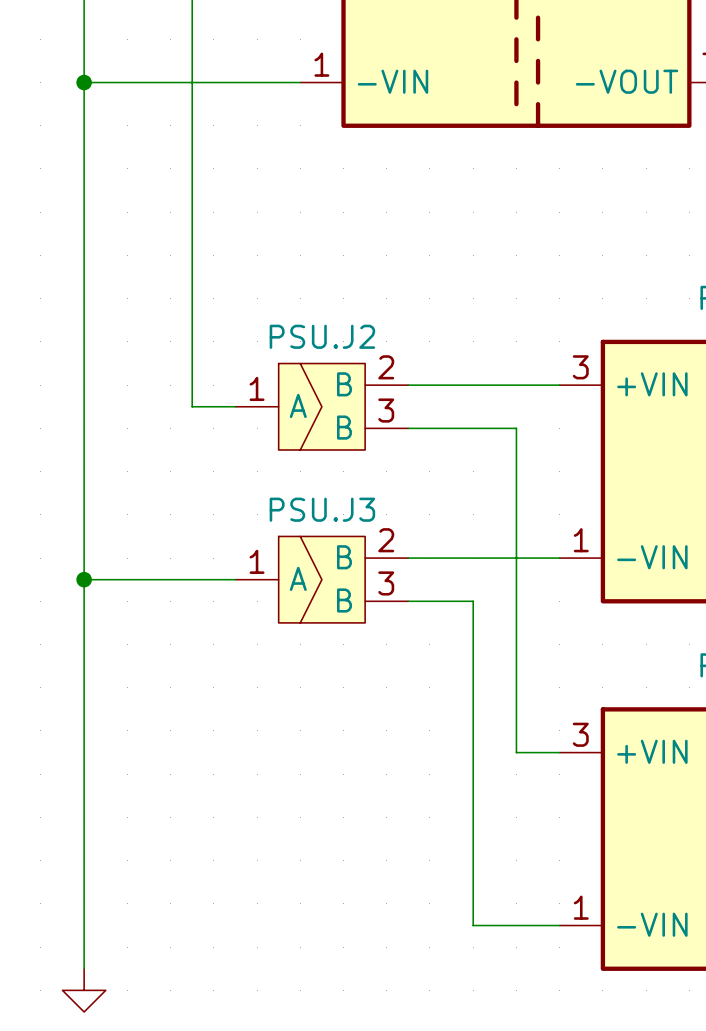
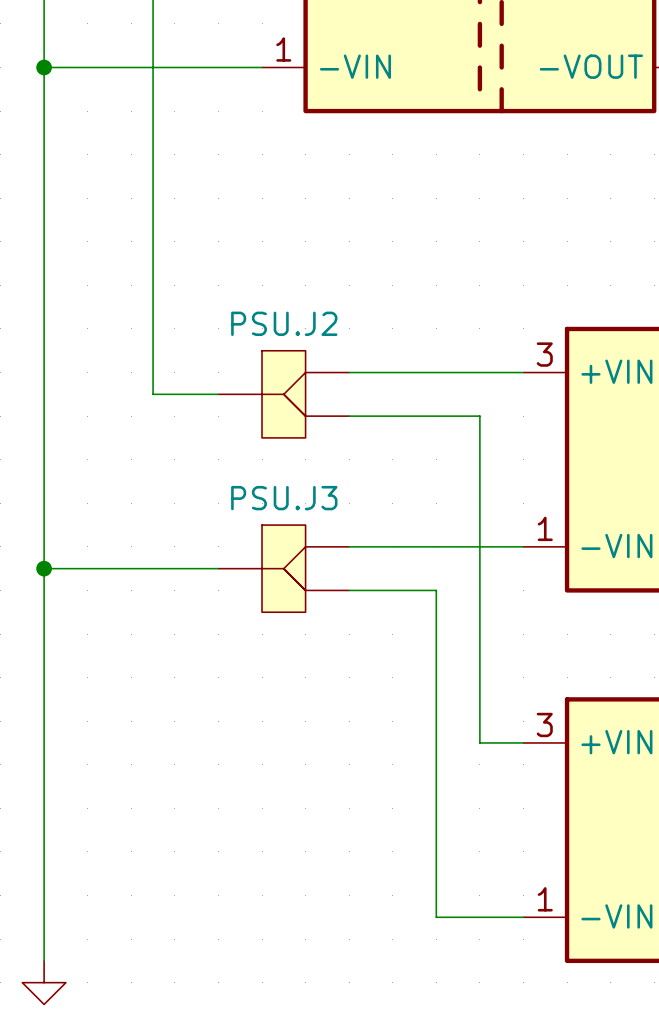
PSU.J2 symbol: [235, 363, 409, 450] -> [218, 350, 350, 438]
PSU.J3 symbol: [235, 536, 409, 623] -> [218, 525, 350, 613]

